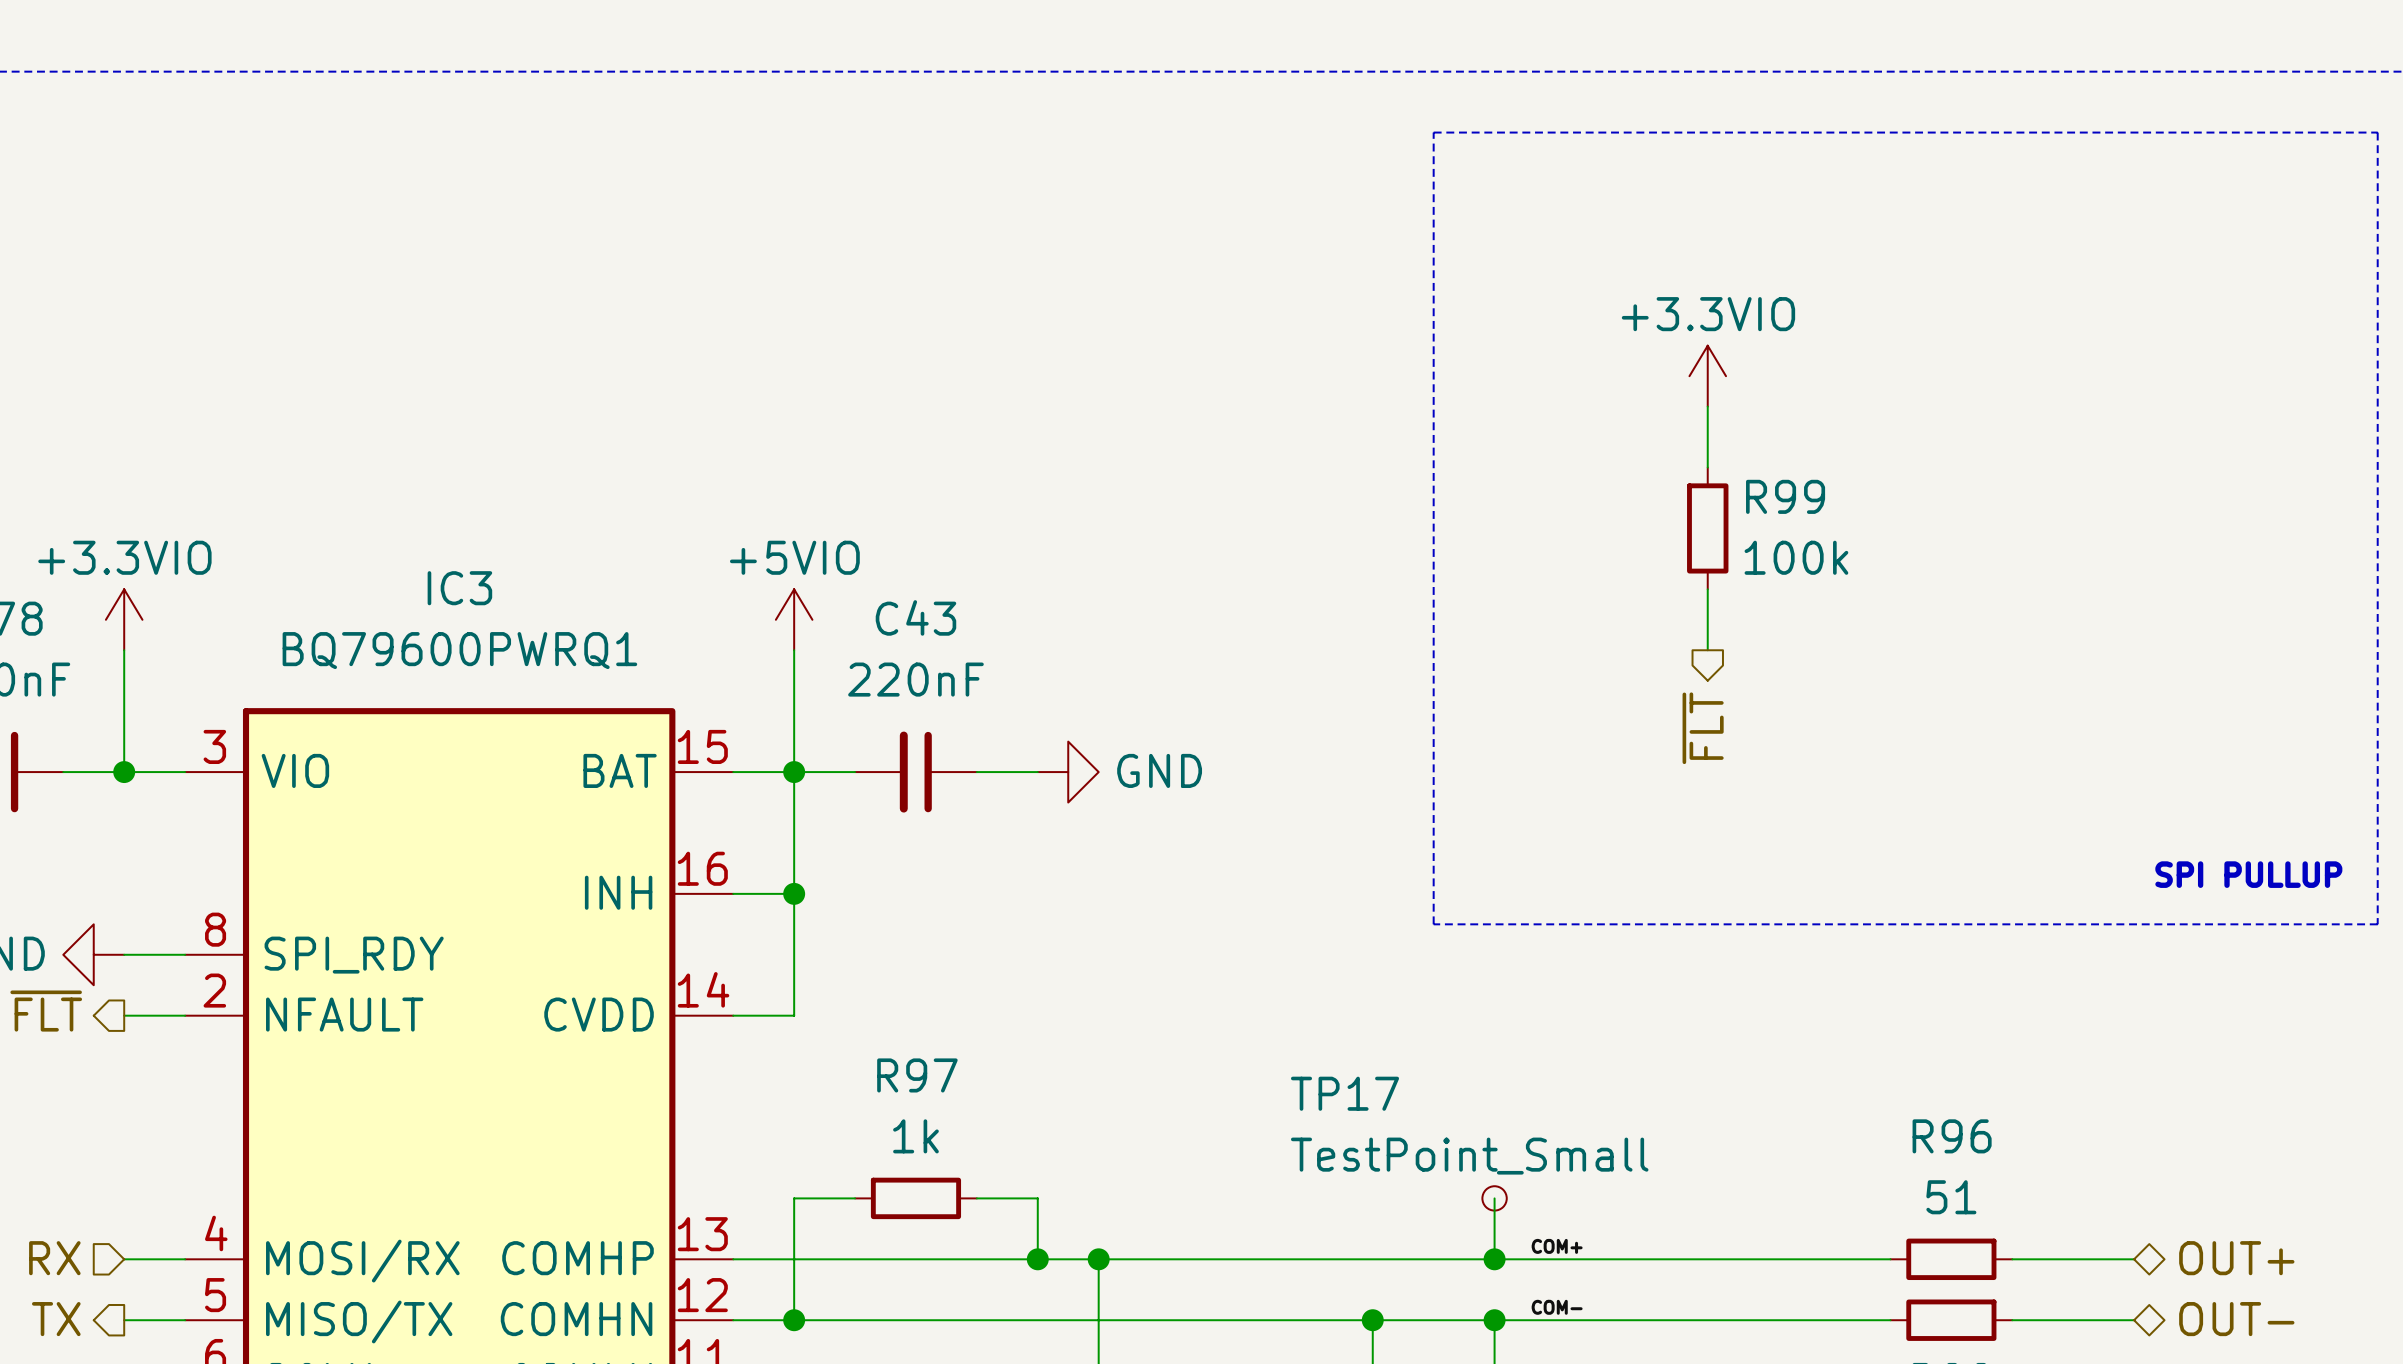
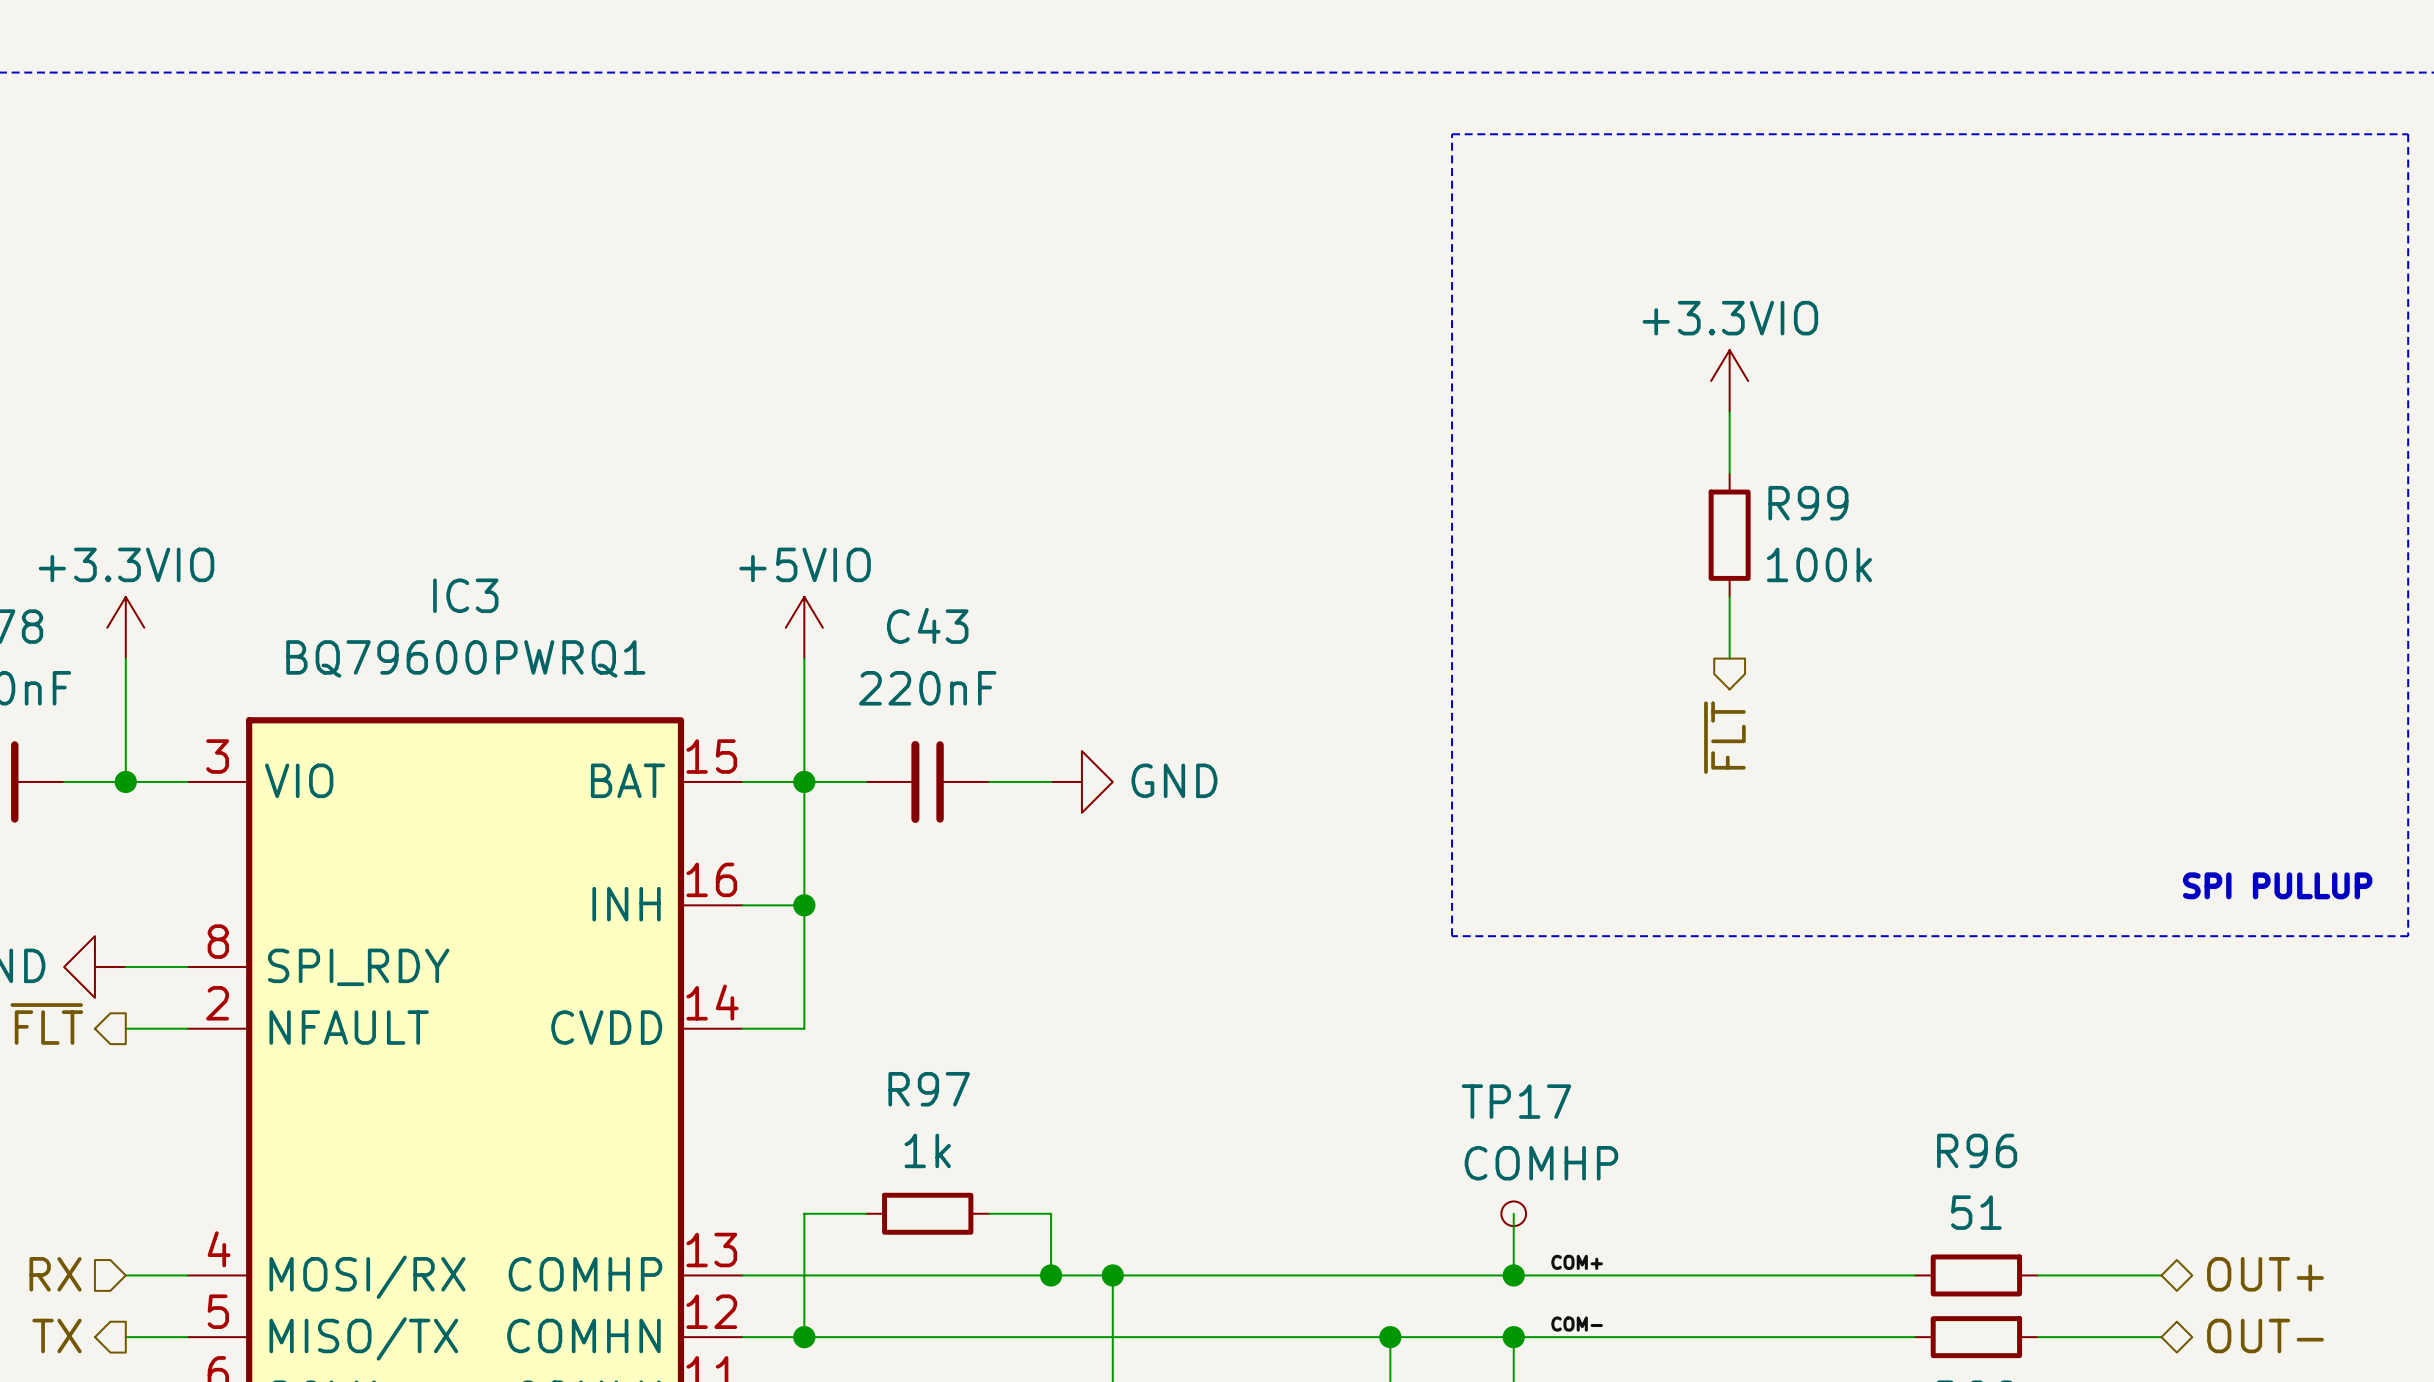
TP17 name position: TP17 (1345, 1093) -> TP17 (1516, 1101)
TP17 value: TestPoint_Small (1469, 1156) -> COMHP (1541, 1163)

